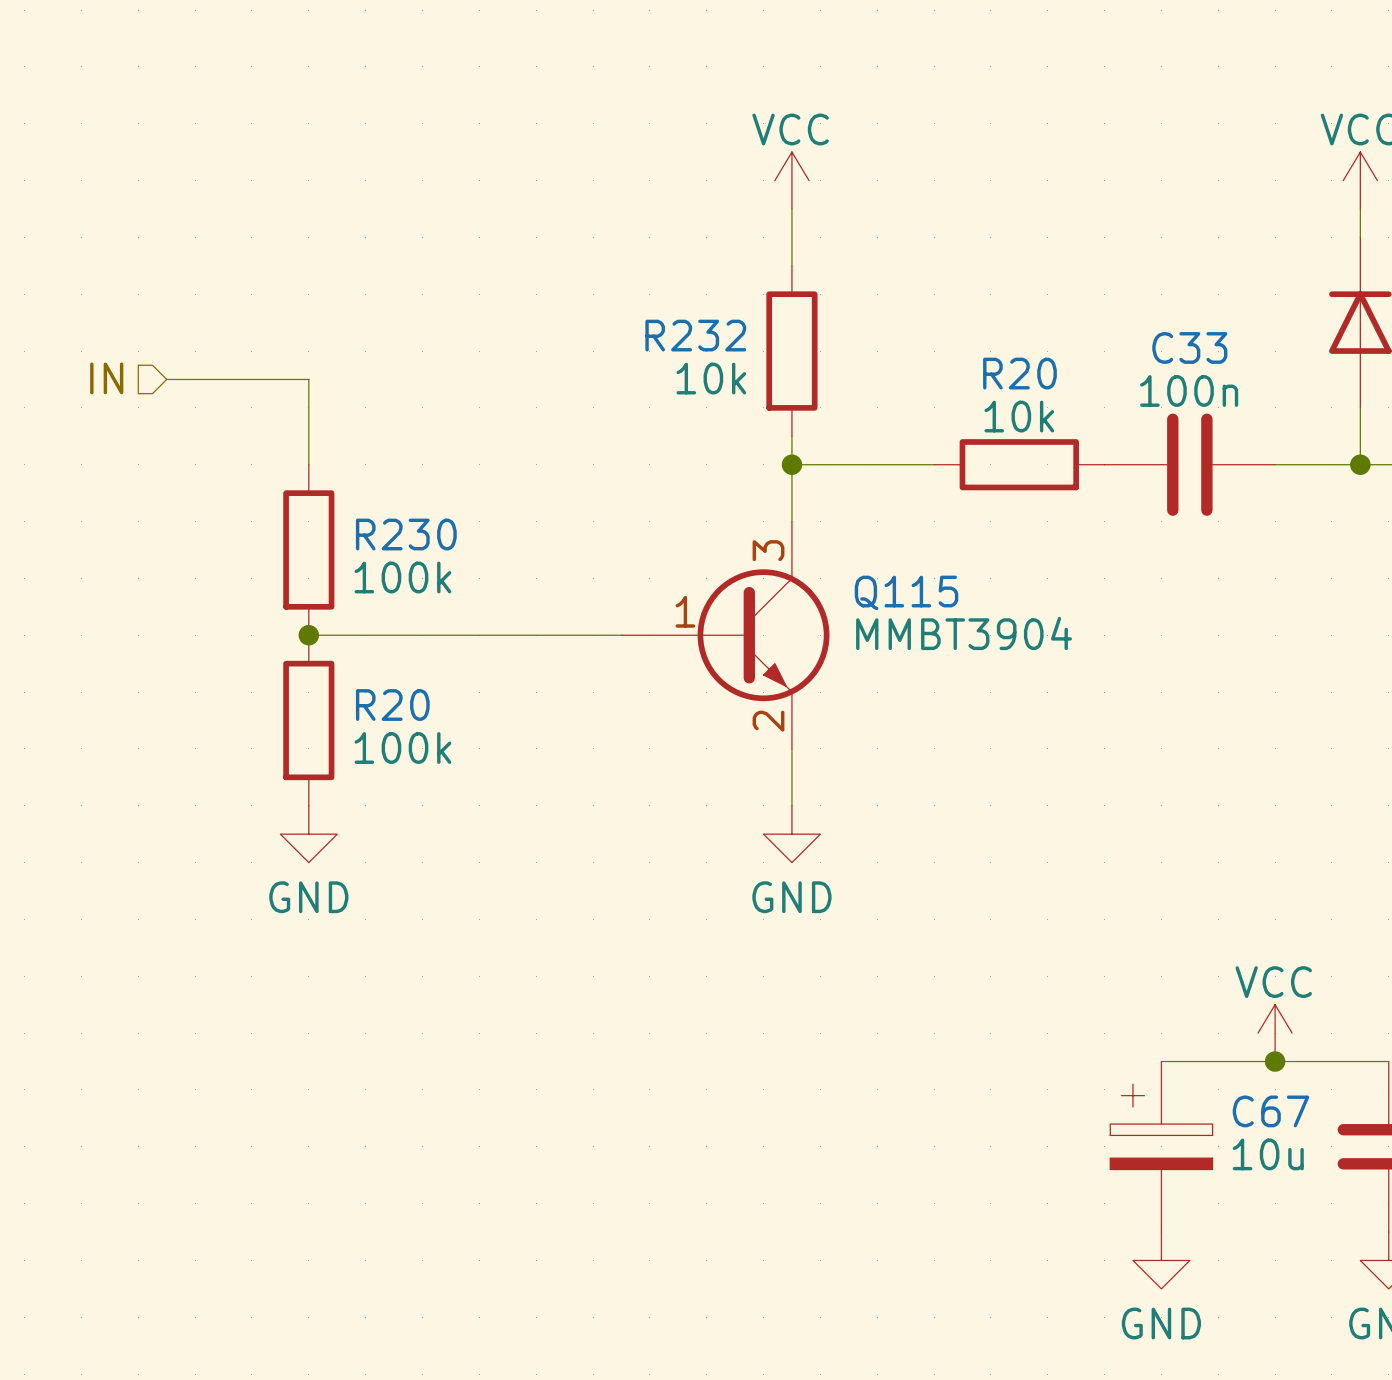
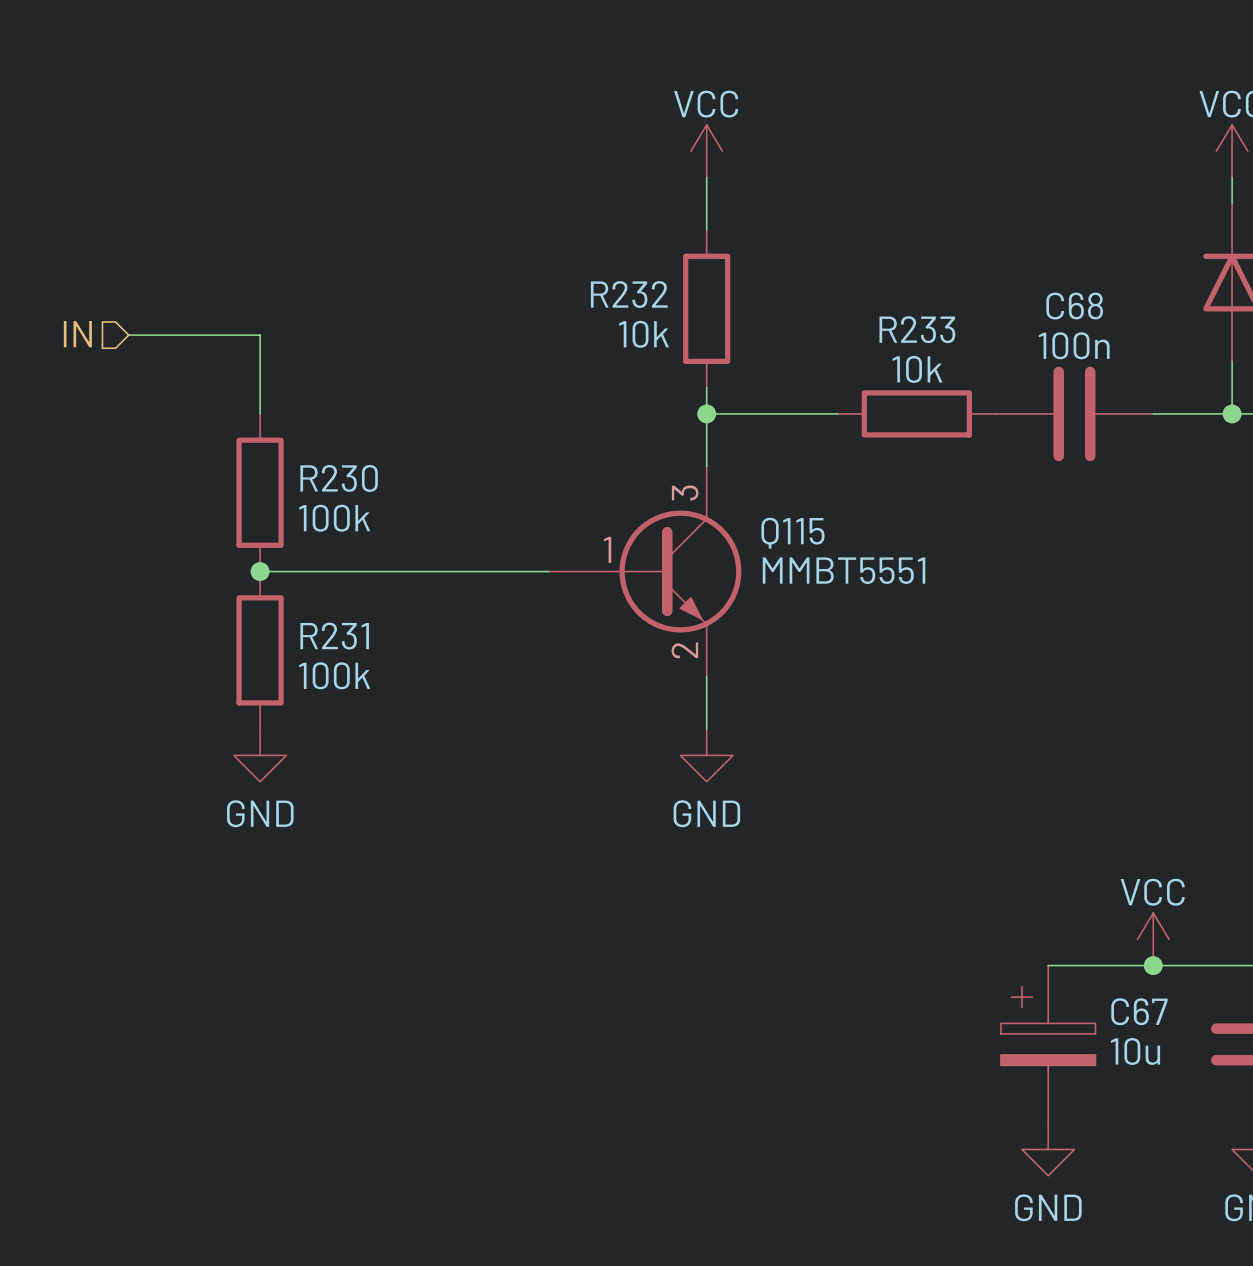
C33 name: C33 (1189, 347) -> C68 (1074, 306)
R20 name: R20 (1019, 373) -> R233 (917, 329)
Q115 value: MMBT3904 (964, 633) -> MMBT5551 (844, 570)
R20 name: R20 (392, 705) -> R231 (334, 636)

